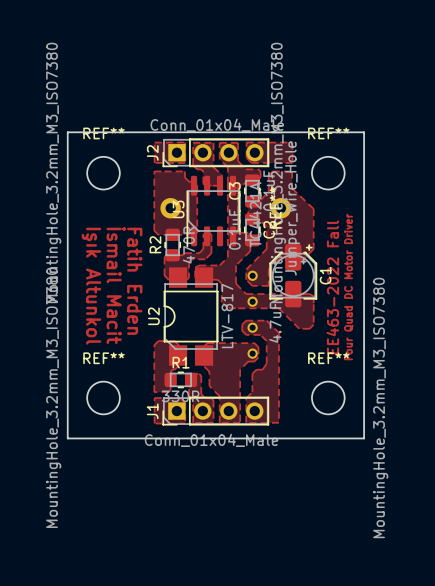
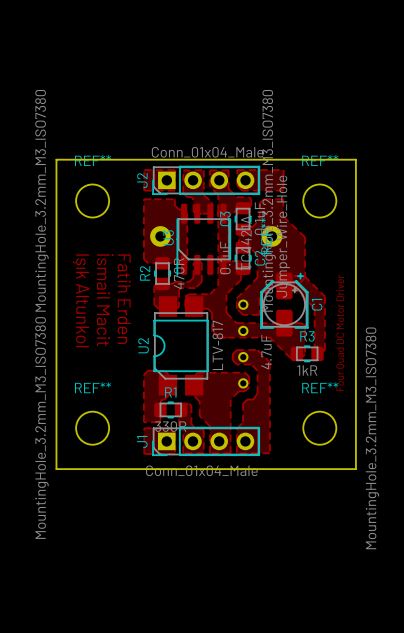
top zone outline: none -> (293, 275) (293, 287) (314, 308) (314, 350) (324, 350) (324, 296) (304, 275) (293, 275)
text: EE463-2022 Fall (332, 287) -> none
R3: none -> 1kR (307, 353)

